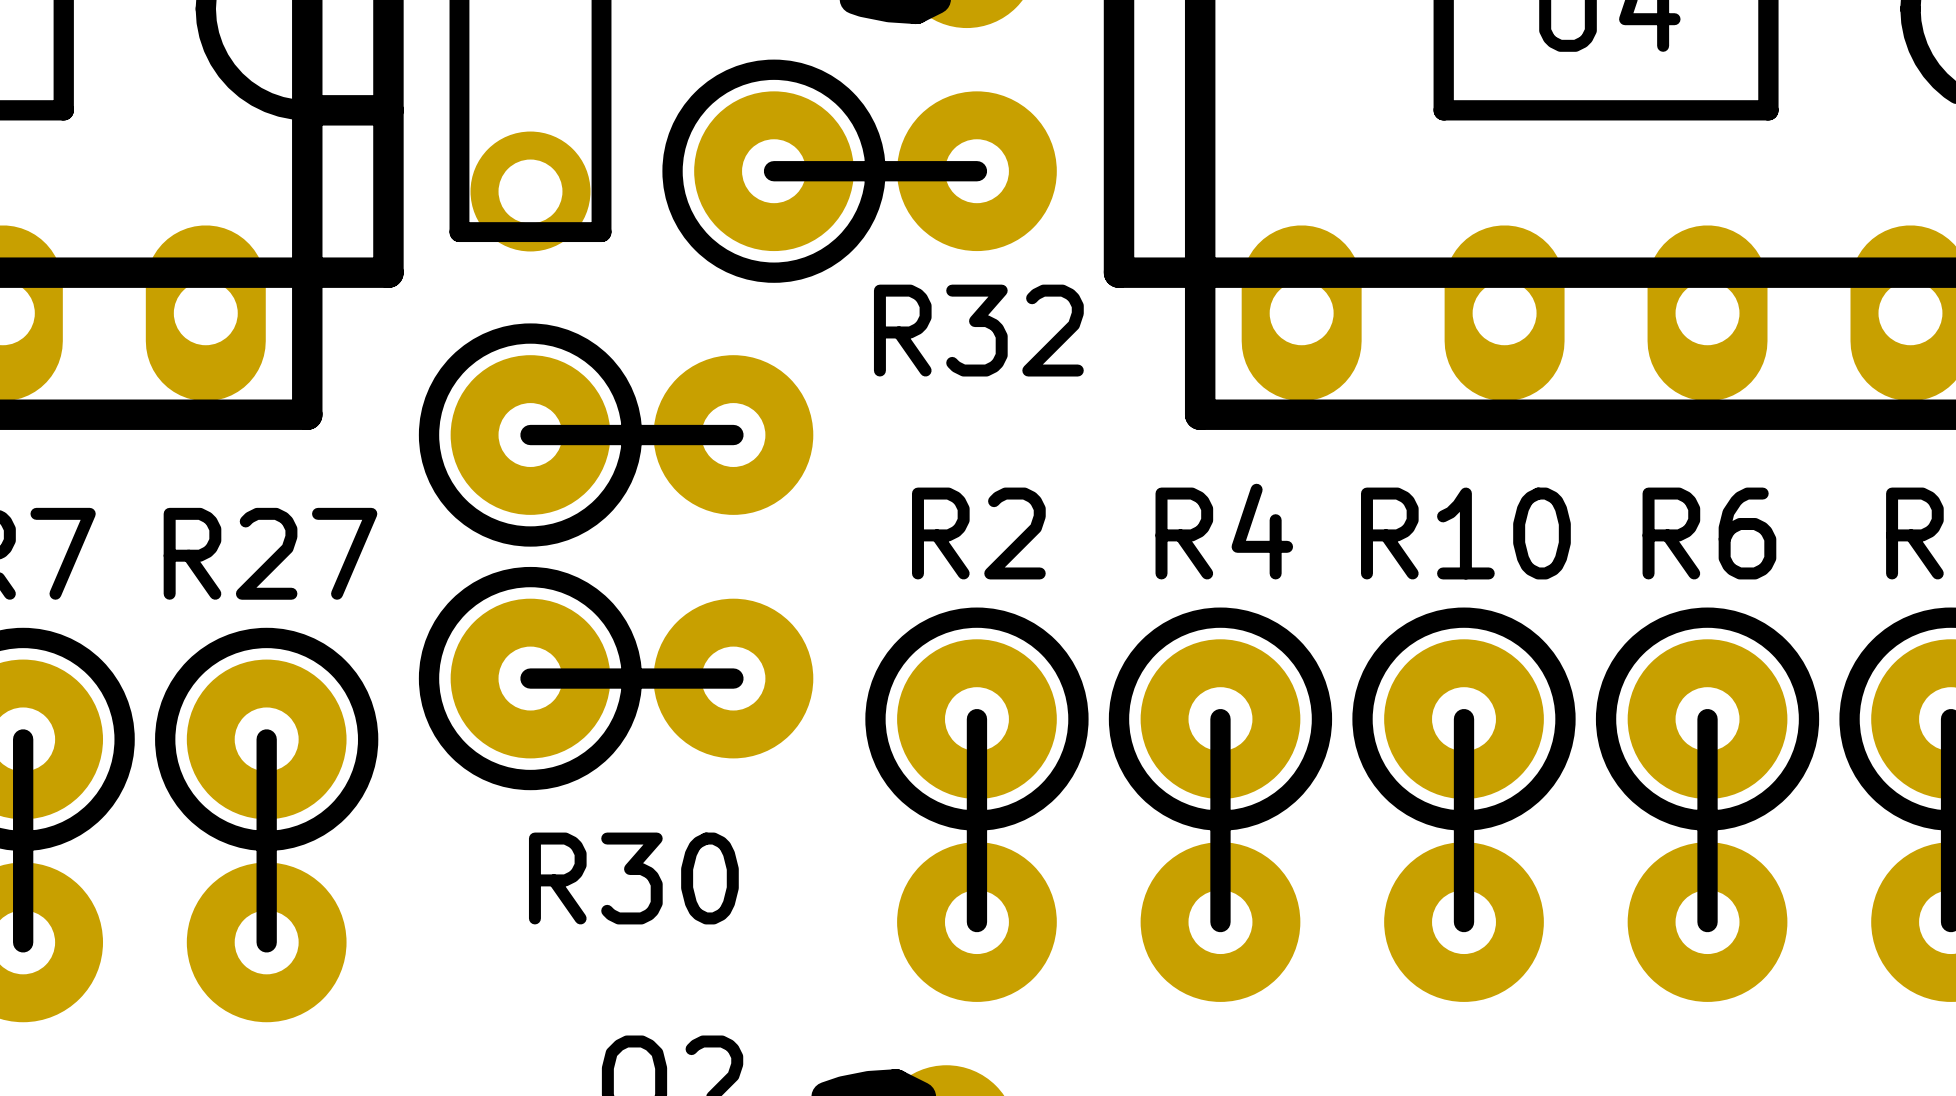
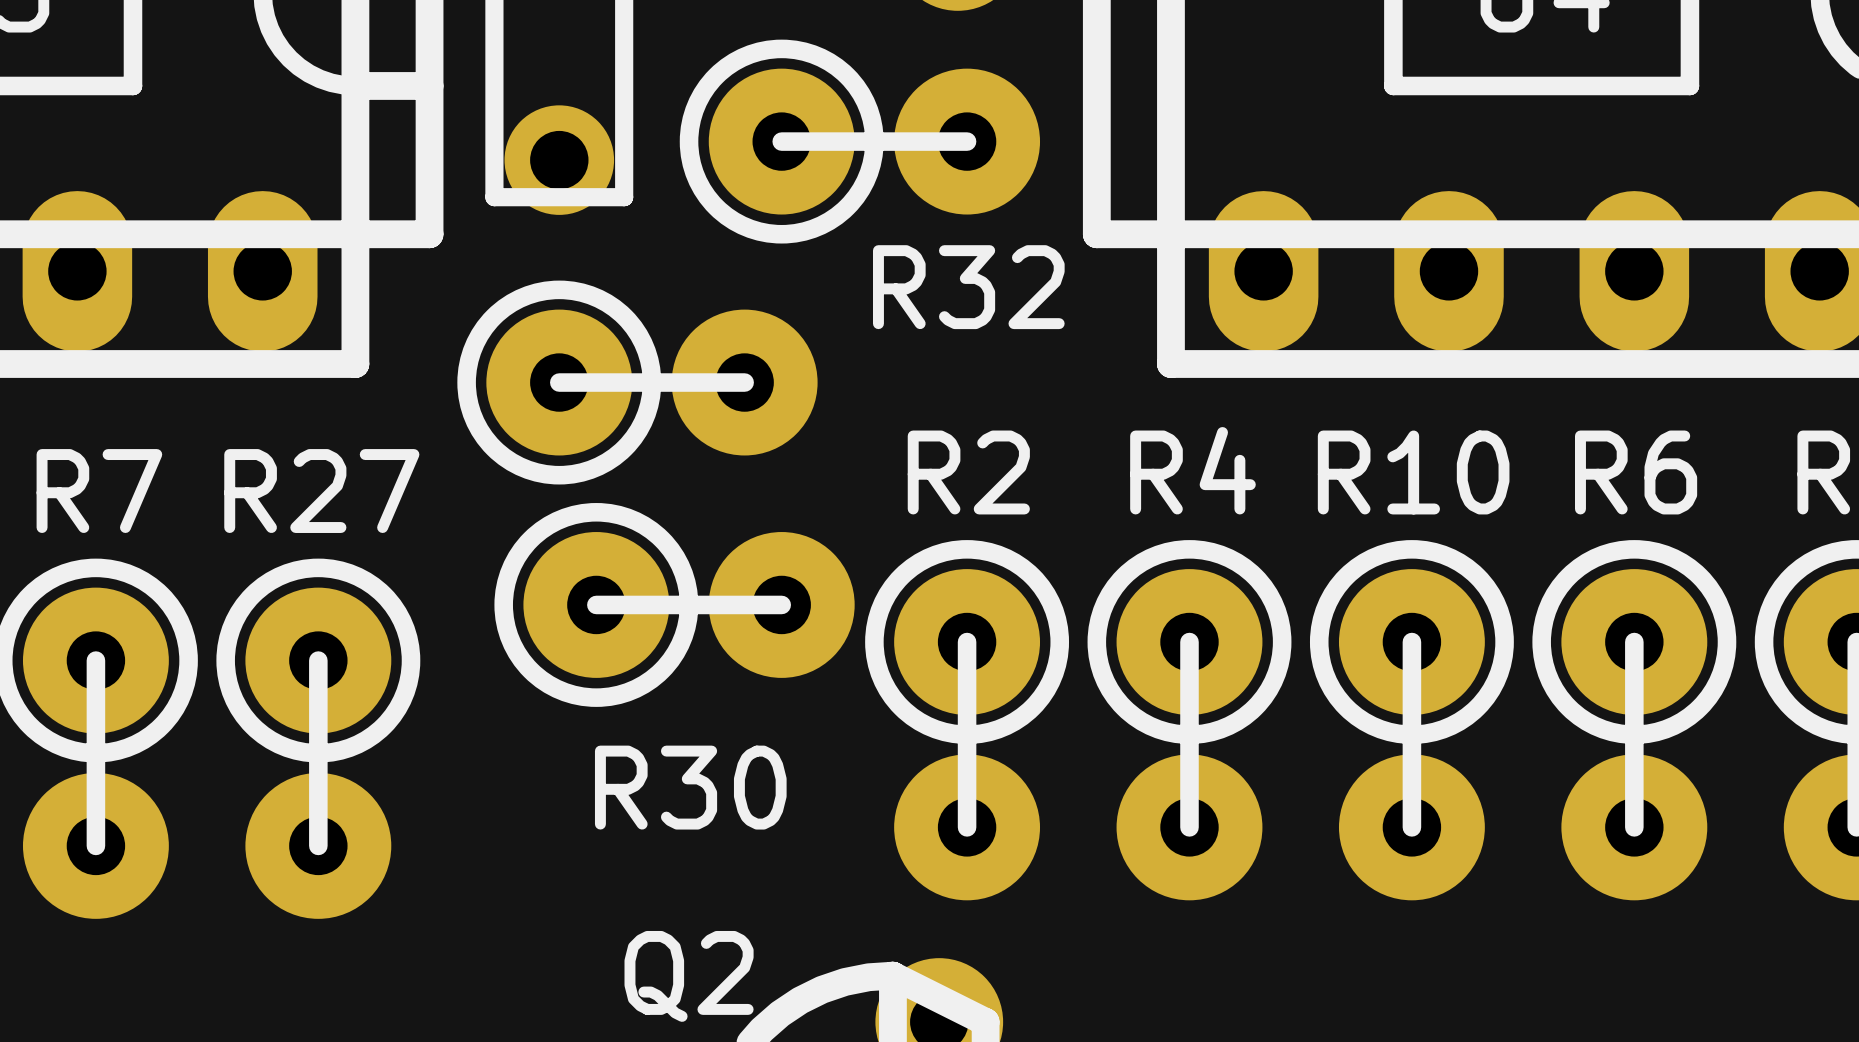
R30 position: (616, 678) -> (674, 604)

